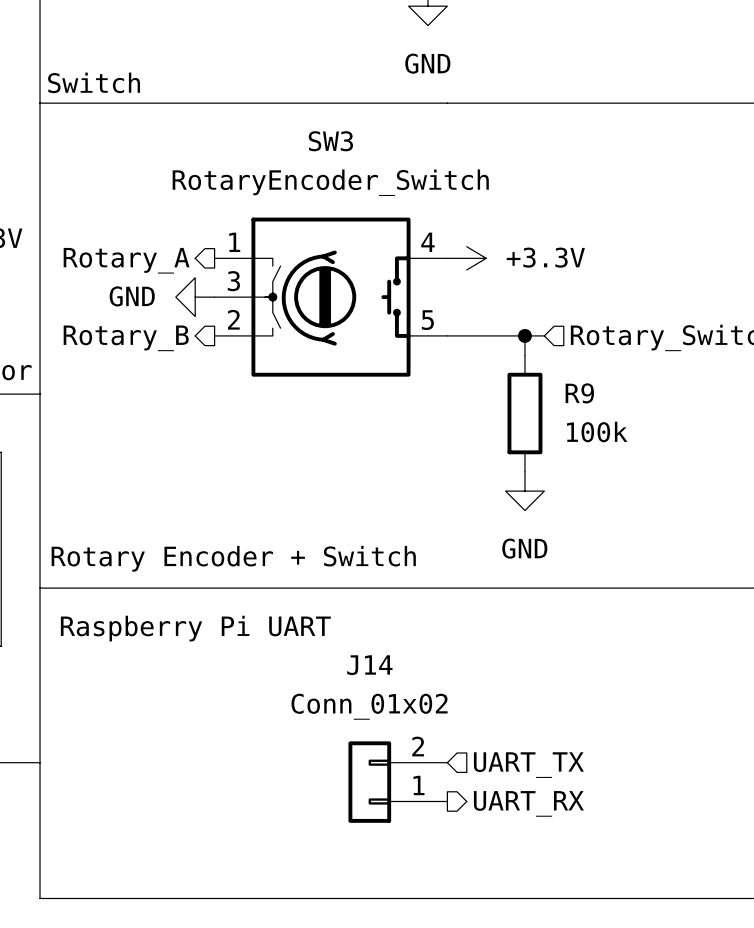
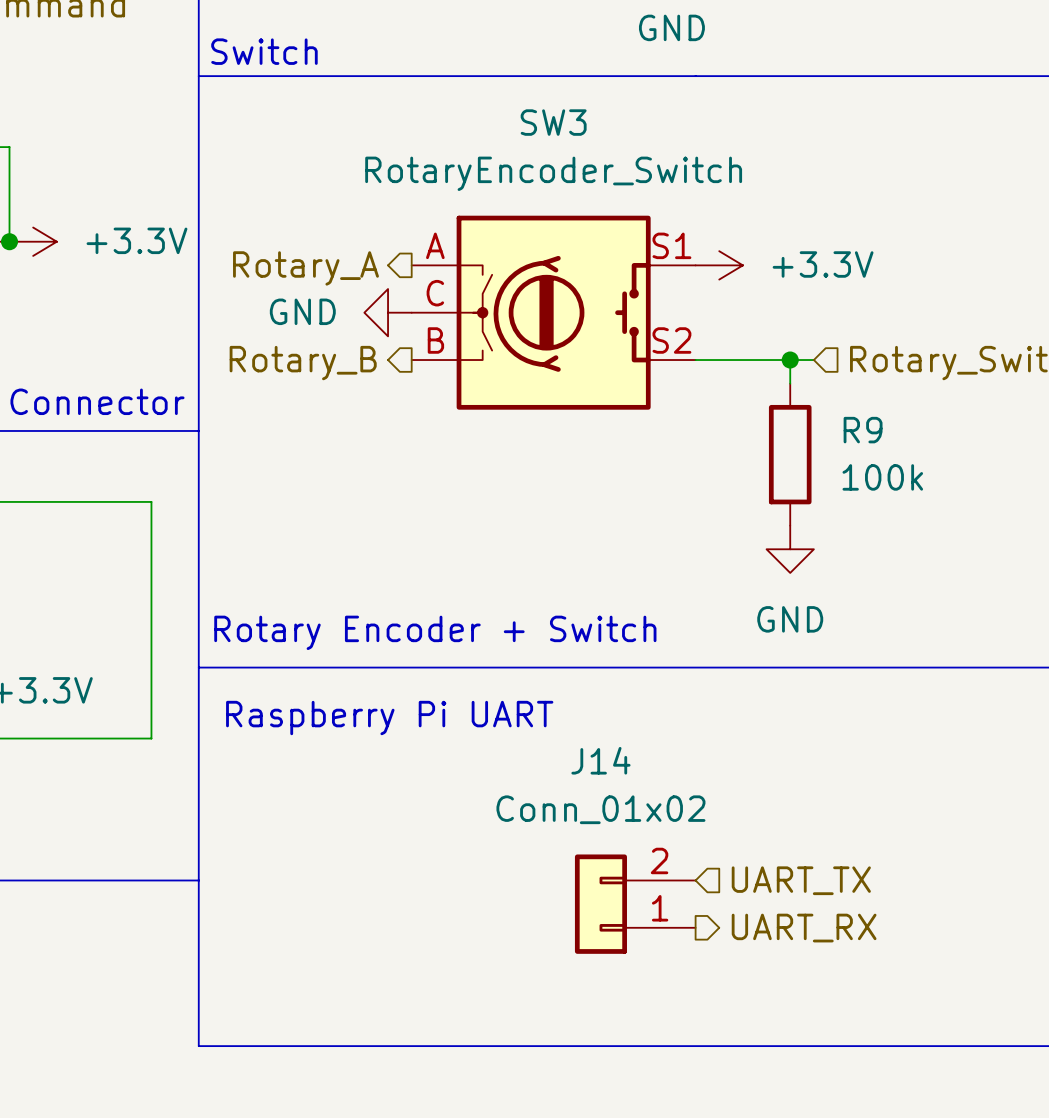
SW3 pin number: 1 (234, 242) -> A (435, 245)
SW3 pin number: 4 (428, 242) -> S1 (671, 245)
SW3 pin number: 3 (233, 281) -> C (435, 293)
SW3 pin number: 2 (233, 319) -> B (435, 340)
SW3 pin number: 5 (427, 320) -> S2 (671, 340)

